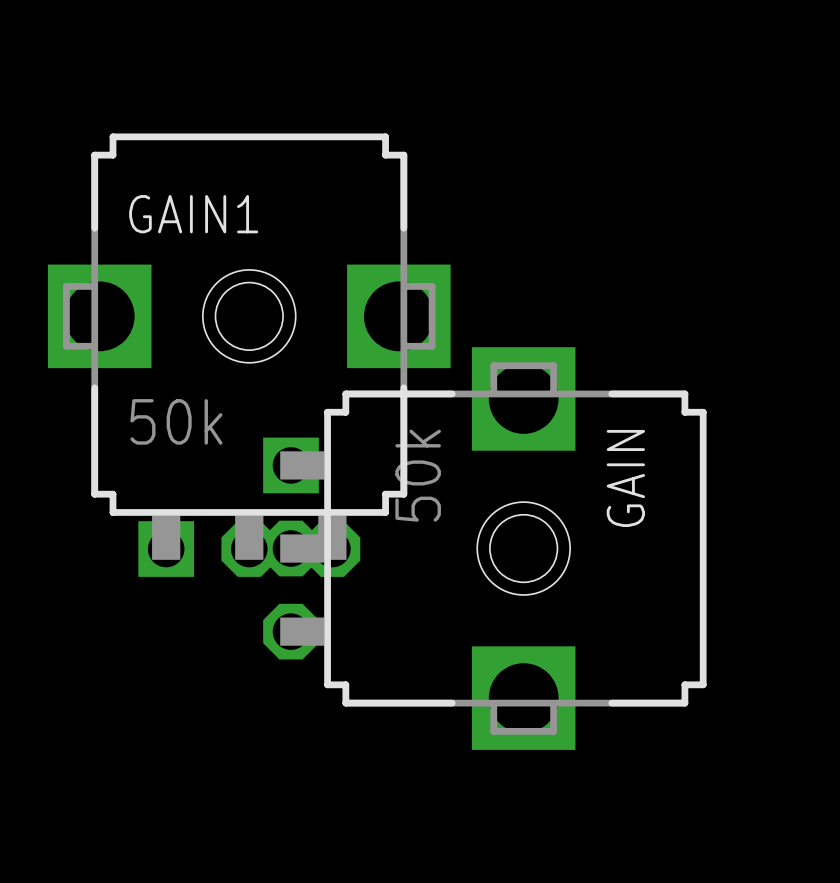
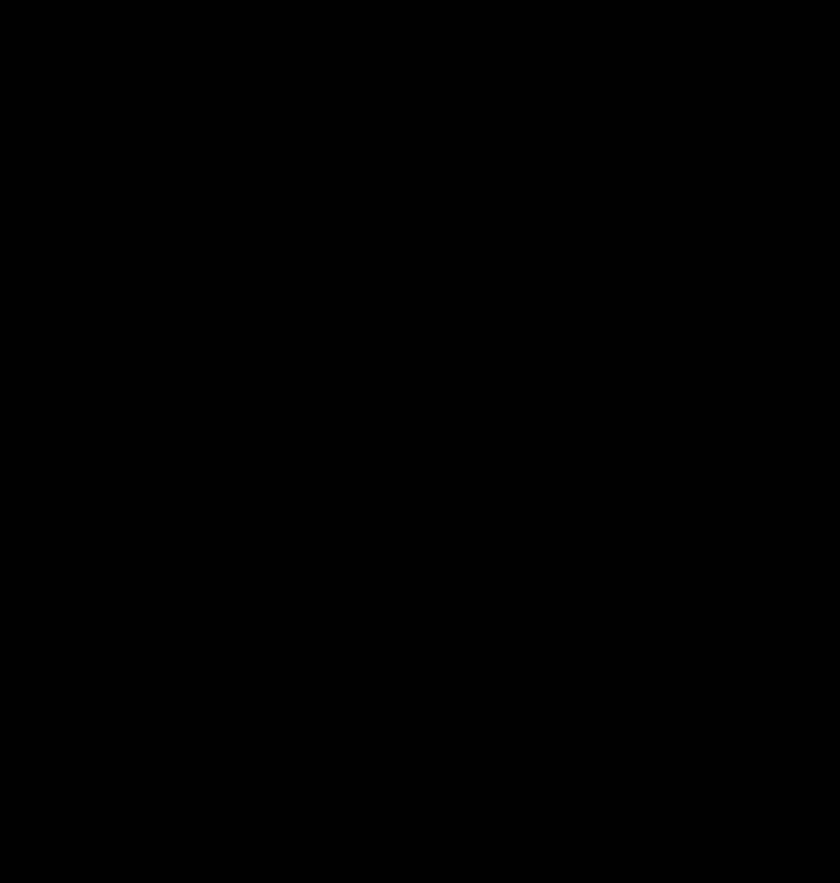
GAIN1: 50k (249, 355) -> none
GAIN: 50k (484, 548) -> none

